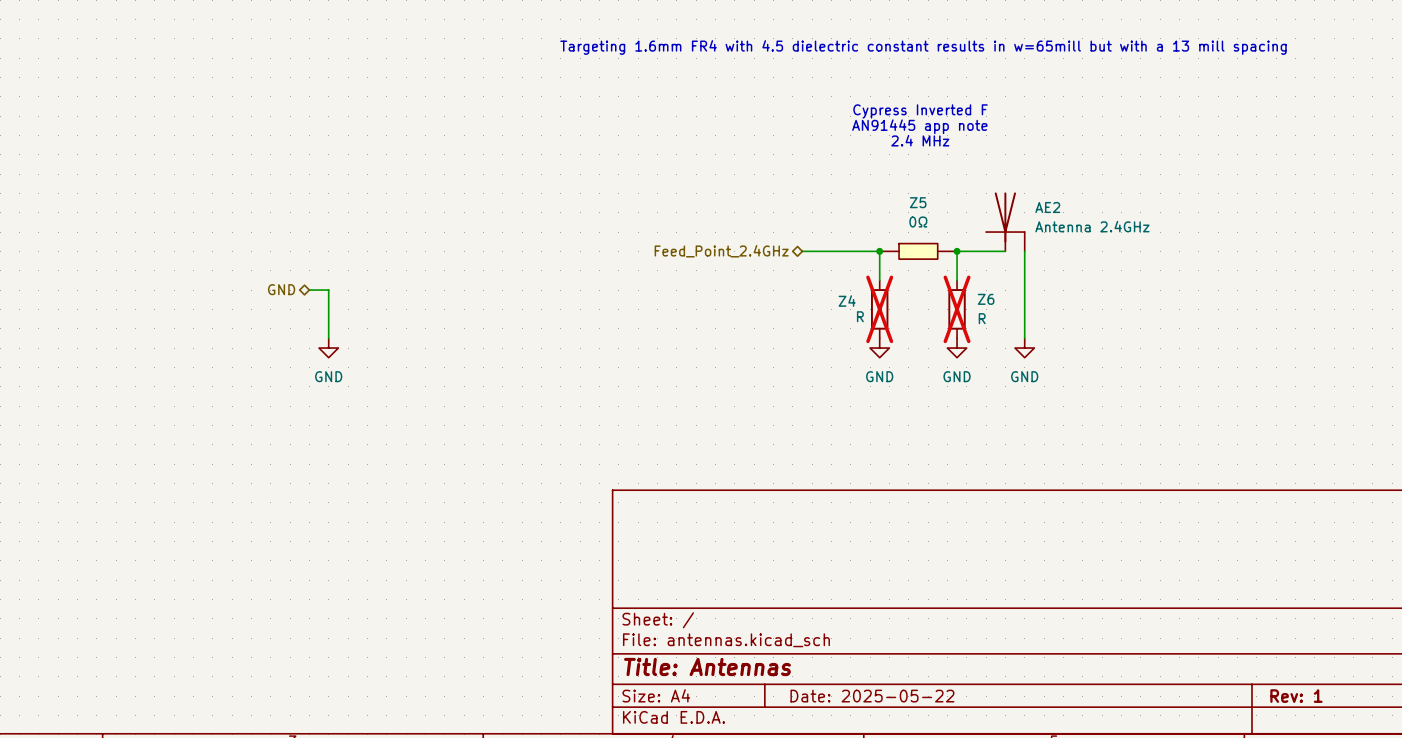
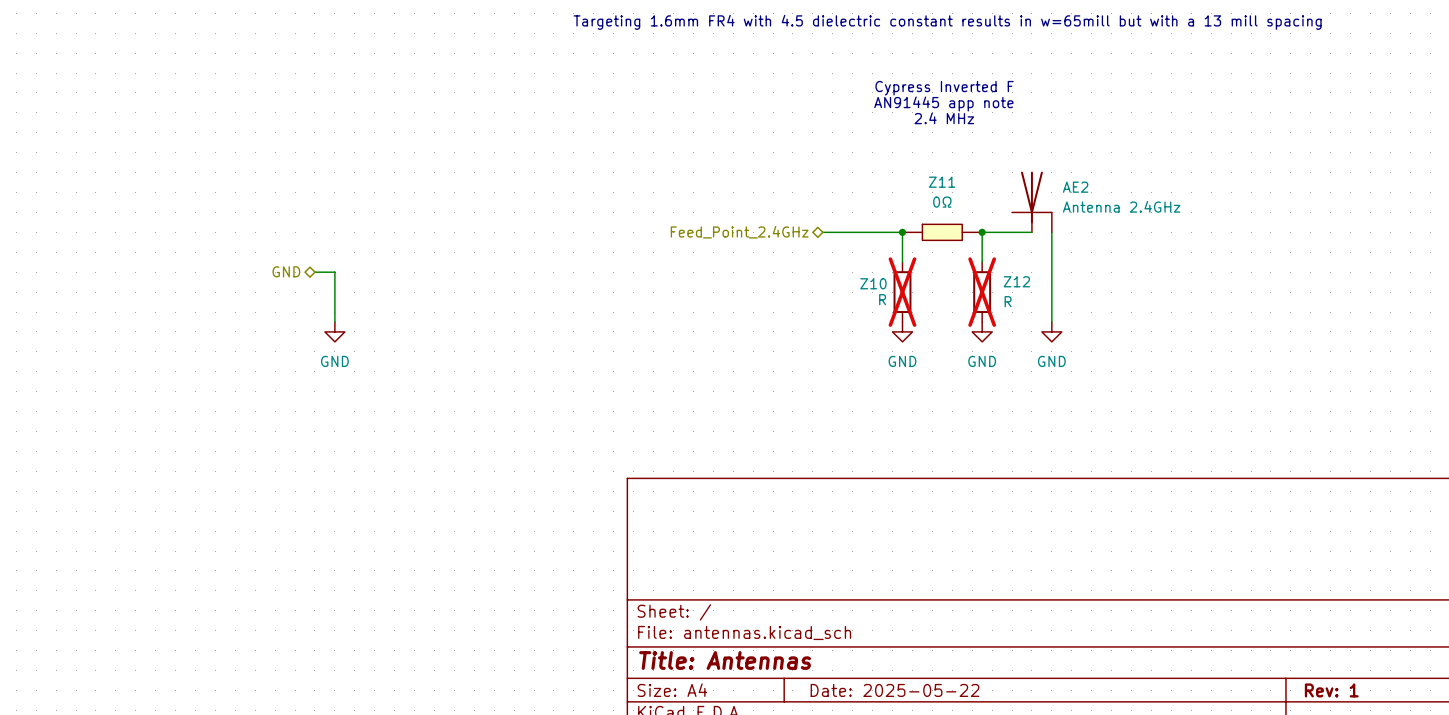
Z5 name: Z5 (918, 202) -> Z11 (942, 182)
Z6 name: Z6 (986, 299) -> Z12 (1016, 281)
Z4 name: Z4 (847, 301) -> Z10 (873, 283)

